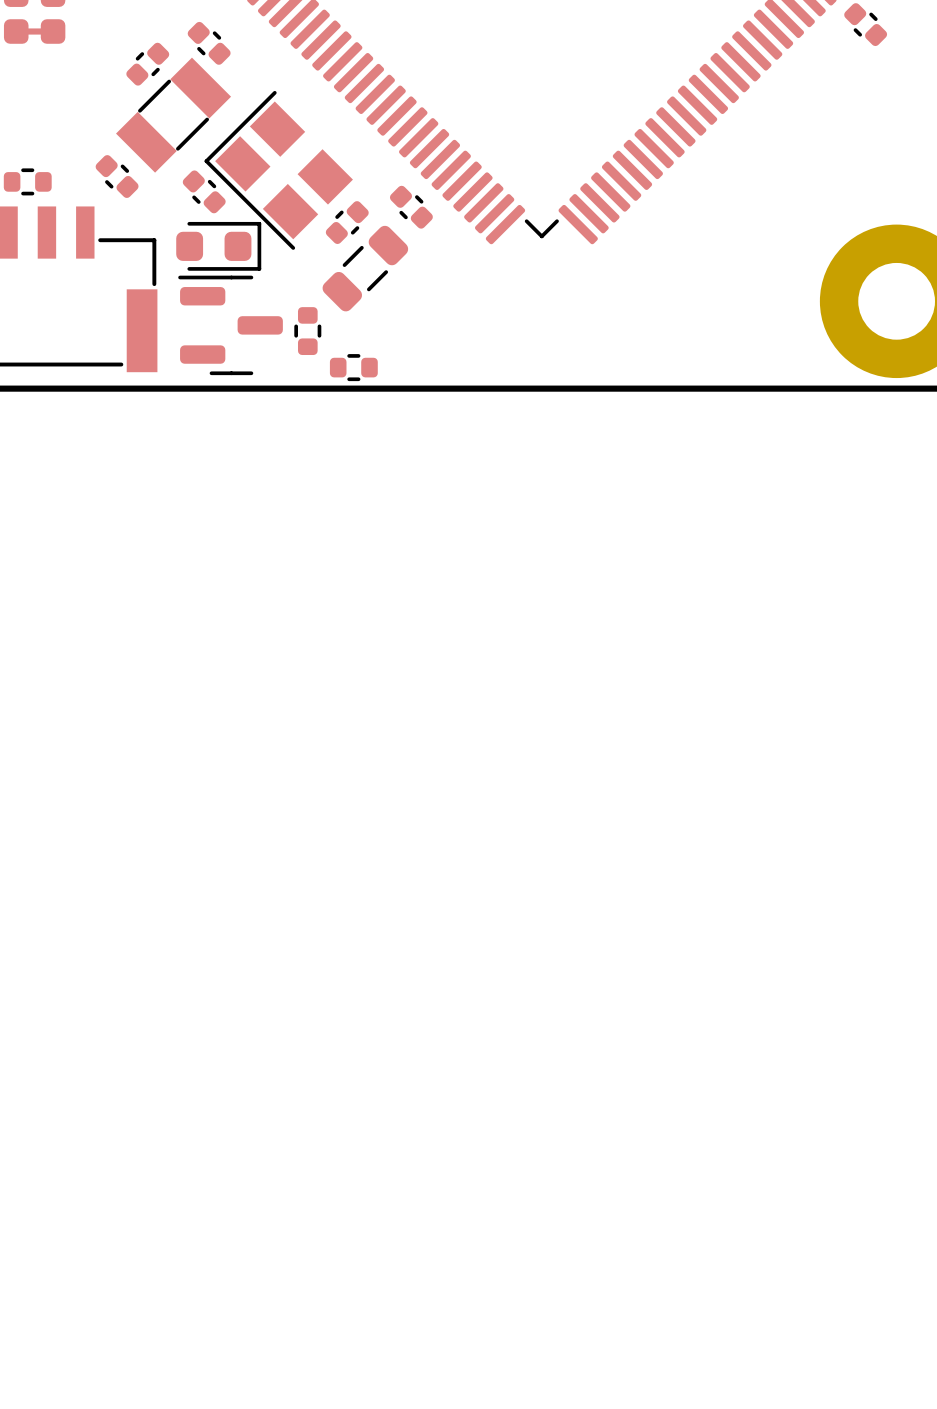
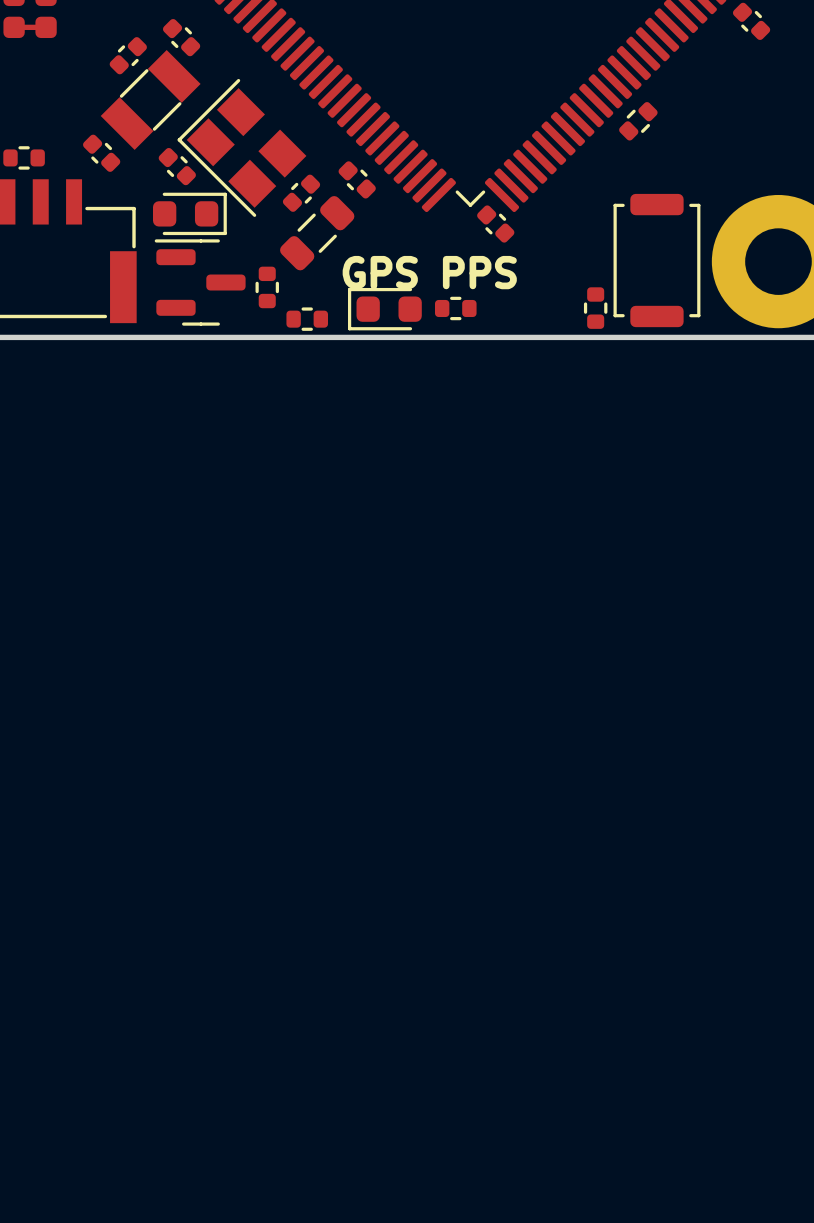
part: none -> (638, 121)
part: none -> (495, 224)
part: none -> (656, 260)
text: none -> GPS PPS (429, 272)
part: none -> (595, 308)
part: none -> (455, 308)
part: none -> (384, 309)

